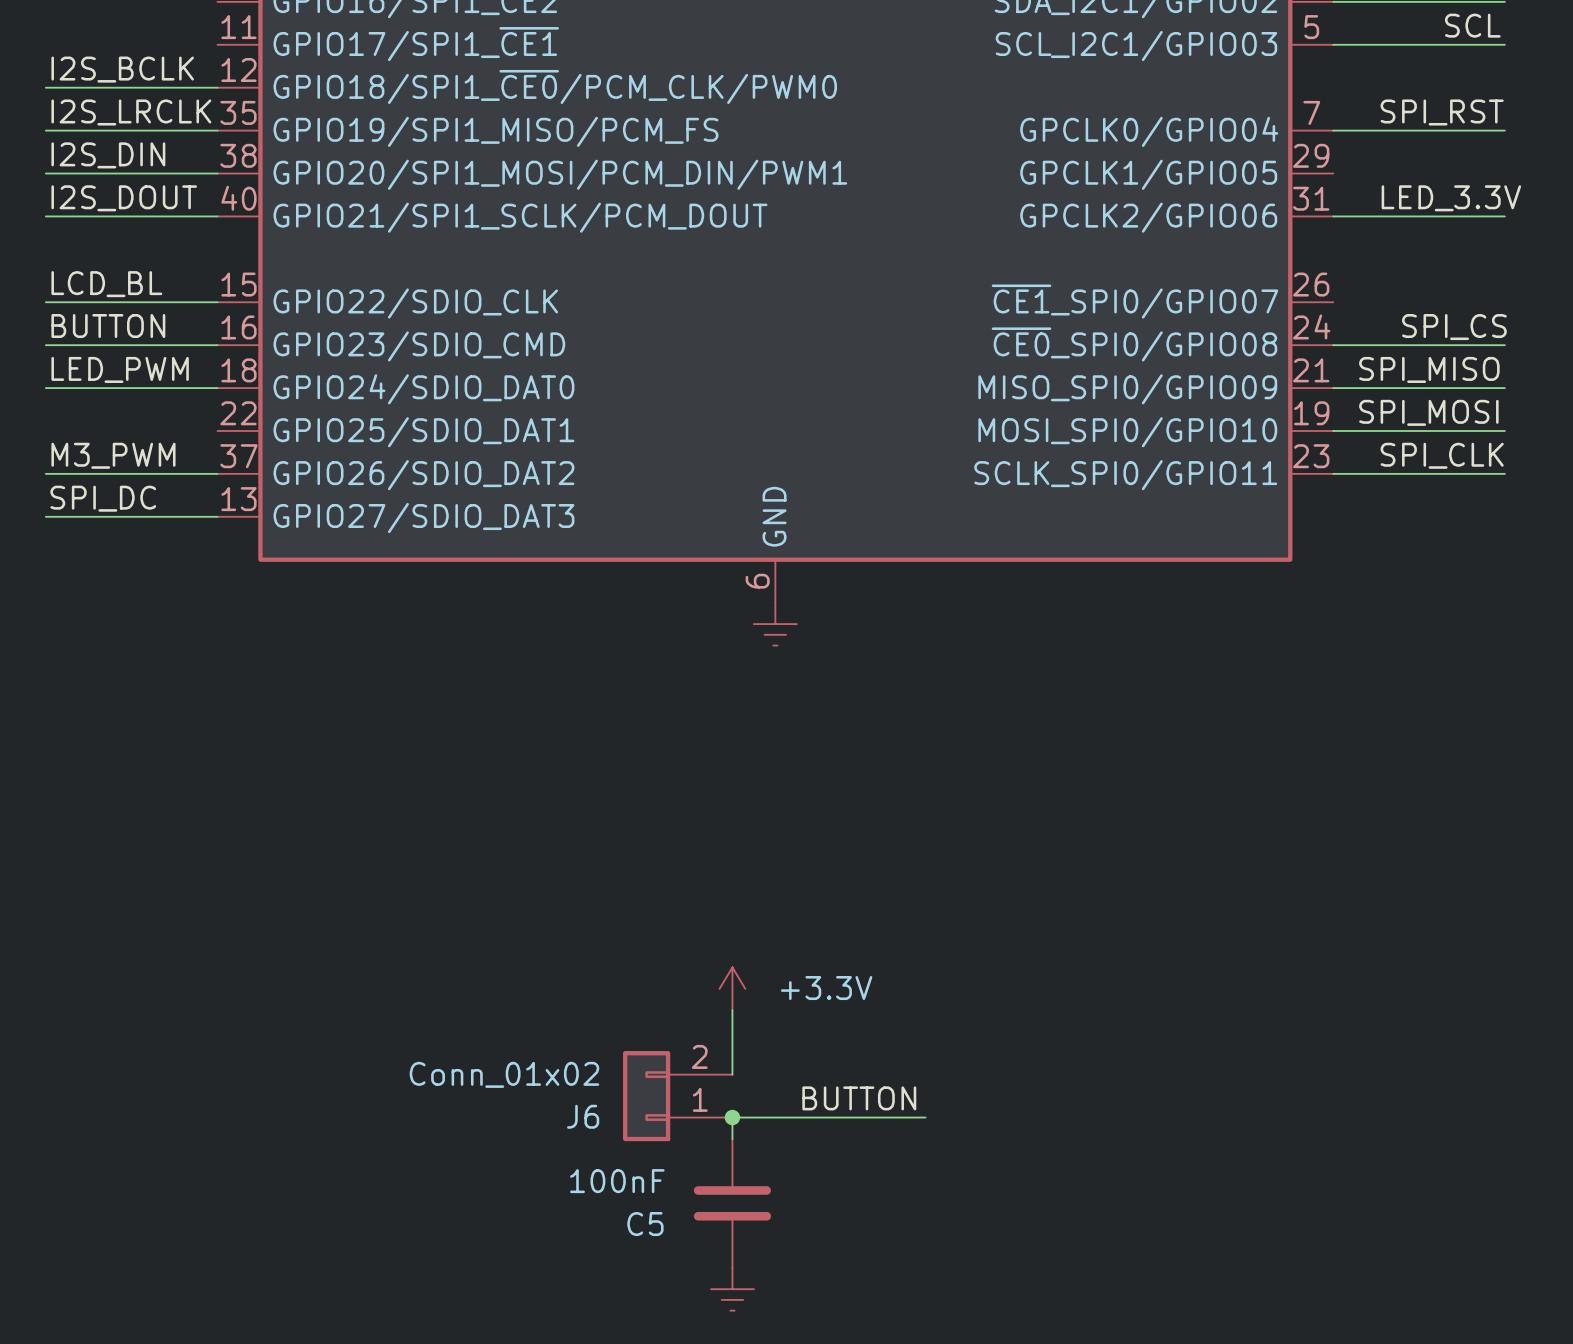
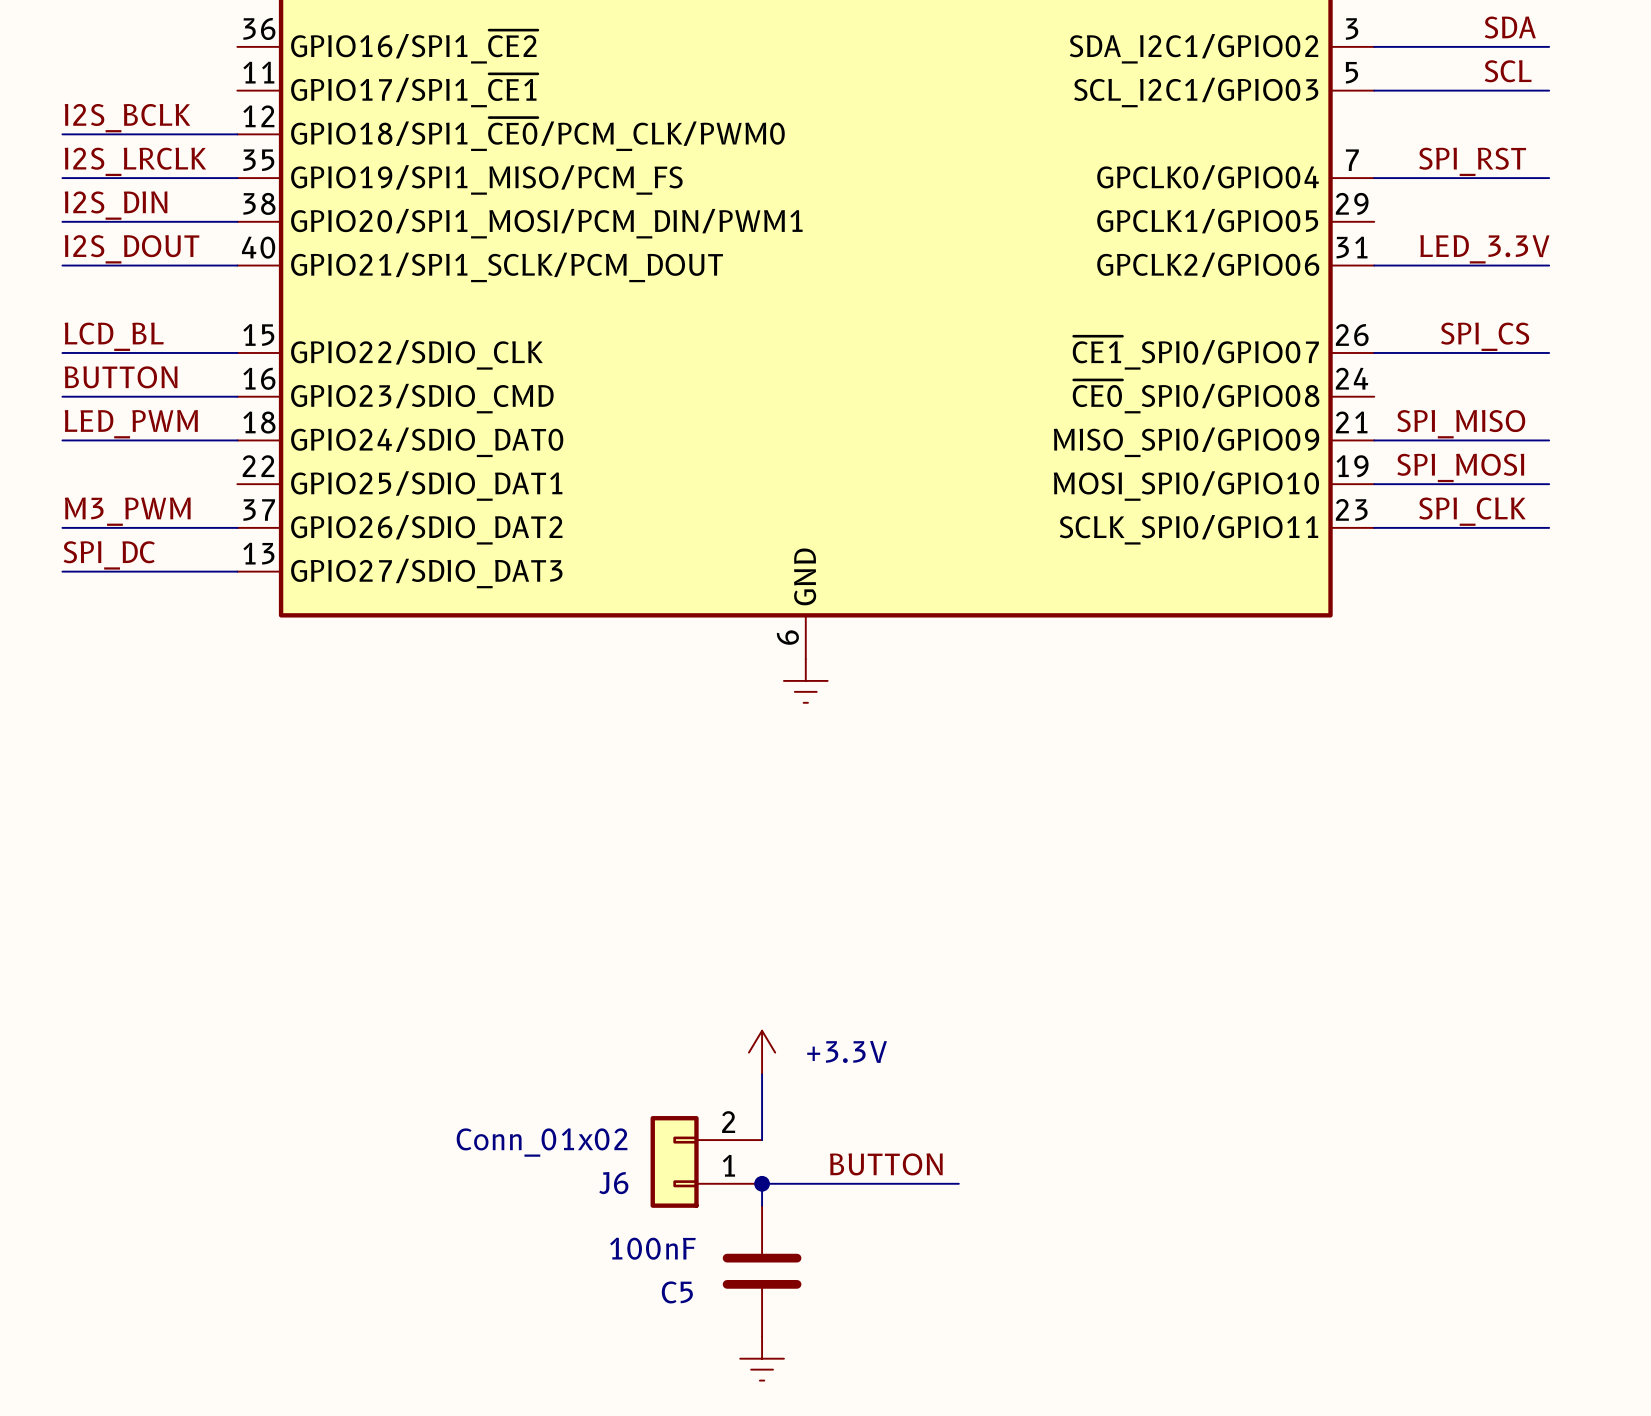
label position: SPI_CS (1454, 327) -> SPI_CS (1485, 336)
wire: (1333, 345) (1504, 345) -> (1374, 352) (1549, 352)

